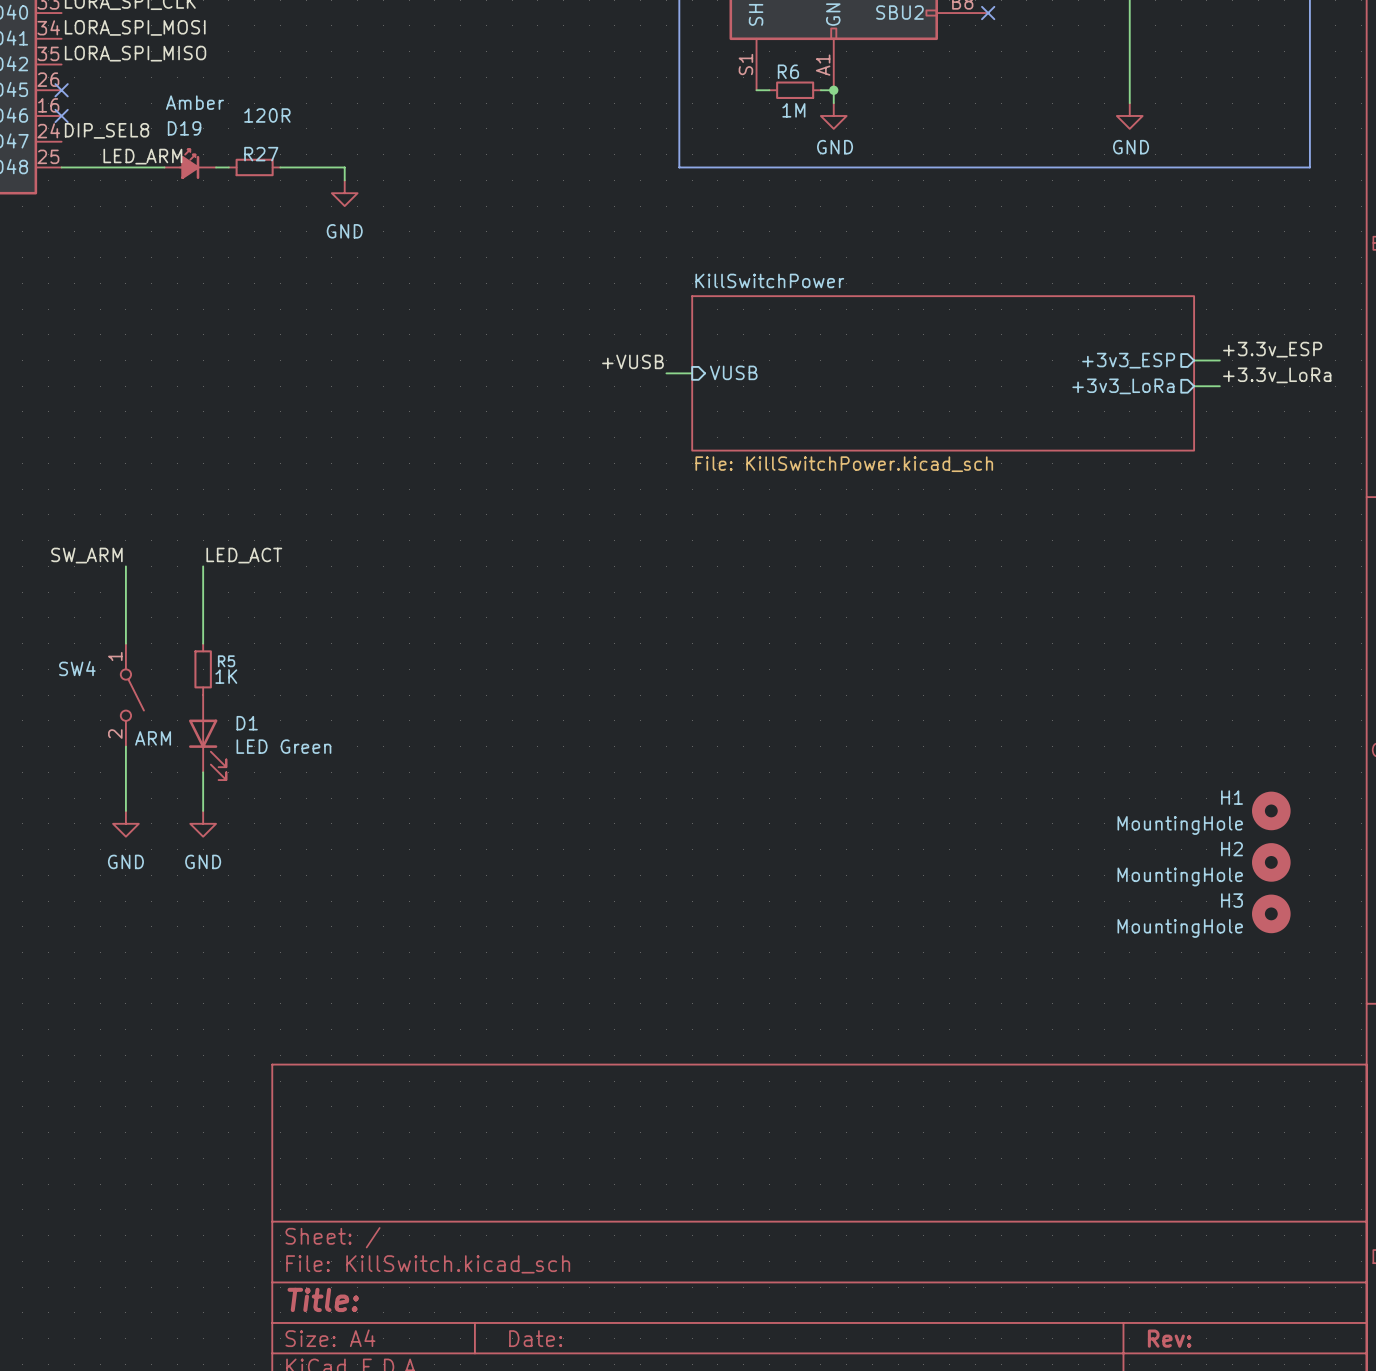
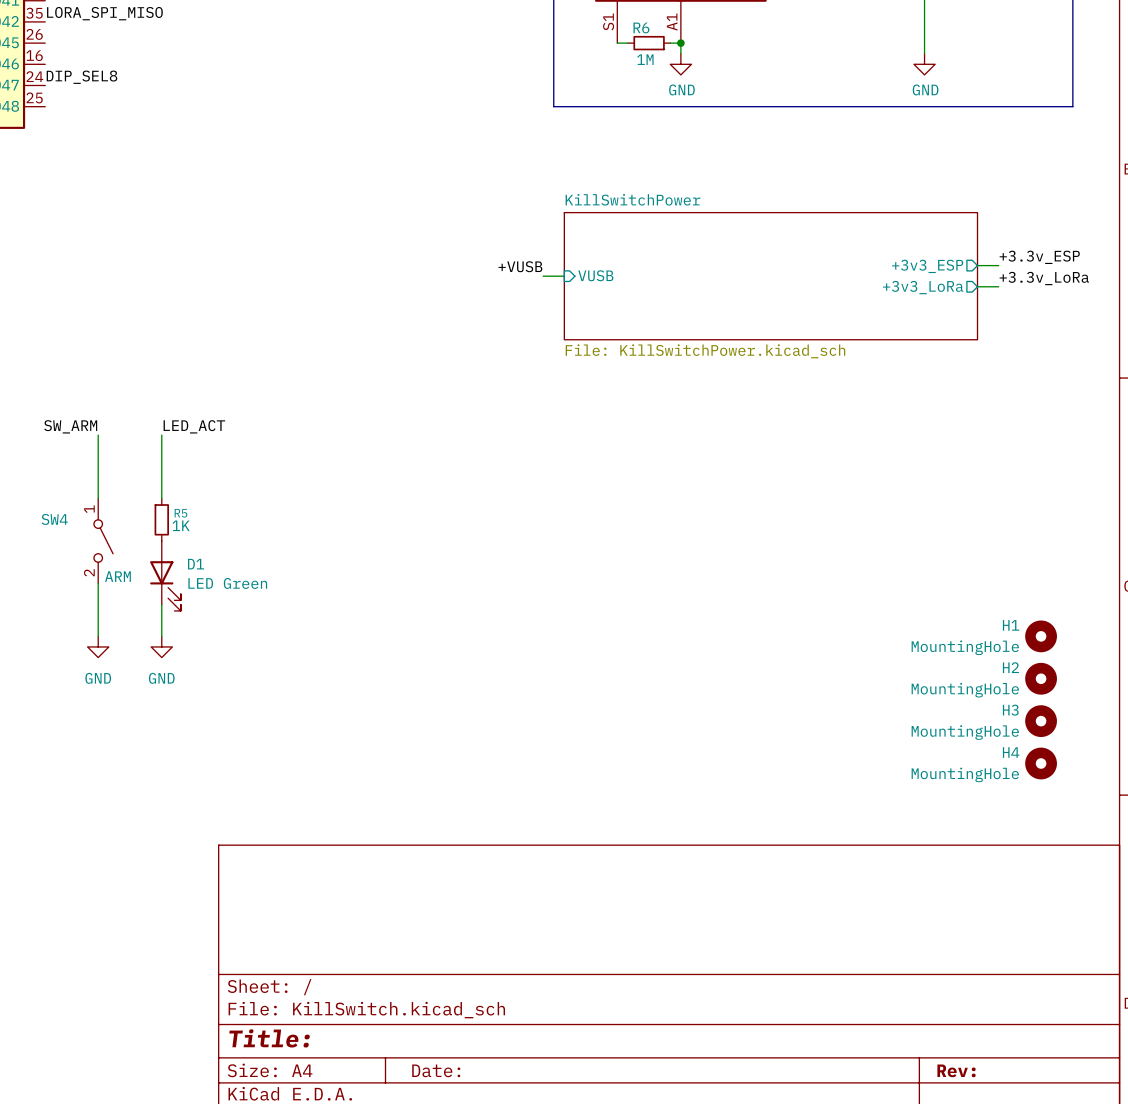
no-connect mark: (61, 90) -> none
no-connect mark: (61, 115) -> none
label: LED_ARM (142, 156) -> none
D19: Amber (190, 164) -> none
wire: (61, 167) (164, 167) -> none
wire: (216, 167) (228, 167) -> none
R27: 120R (254, 167) -> none
wire: (280, 167) (344, 167) (344, 180) -> none
power symbol: GND (344, 193) -> none
H4: none -> MountingHole (1041, 763)

